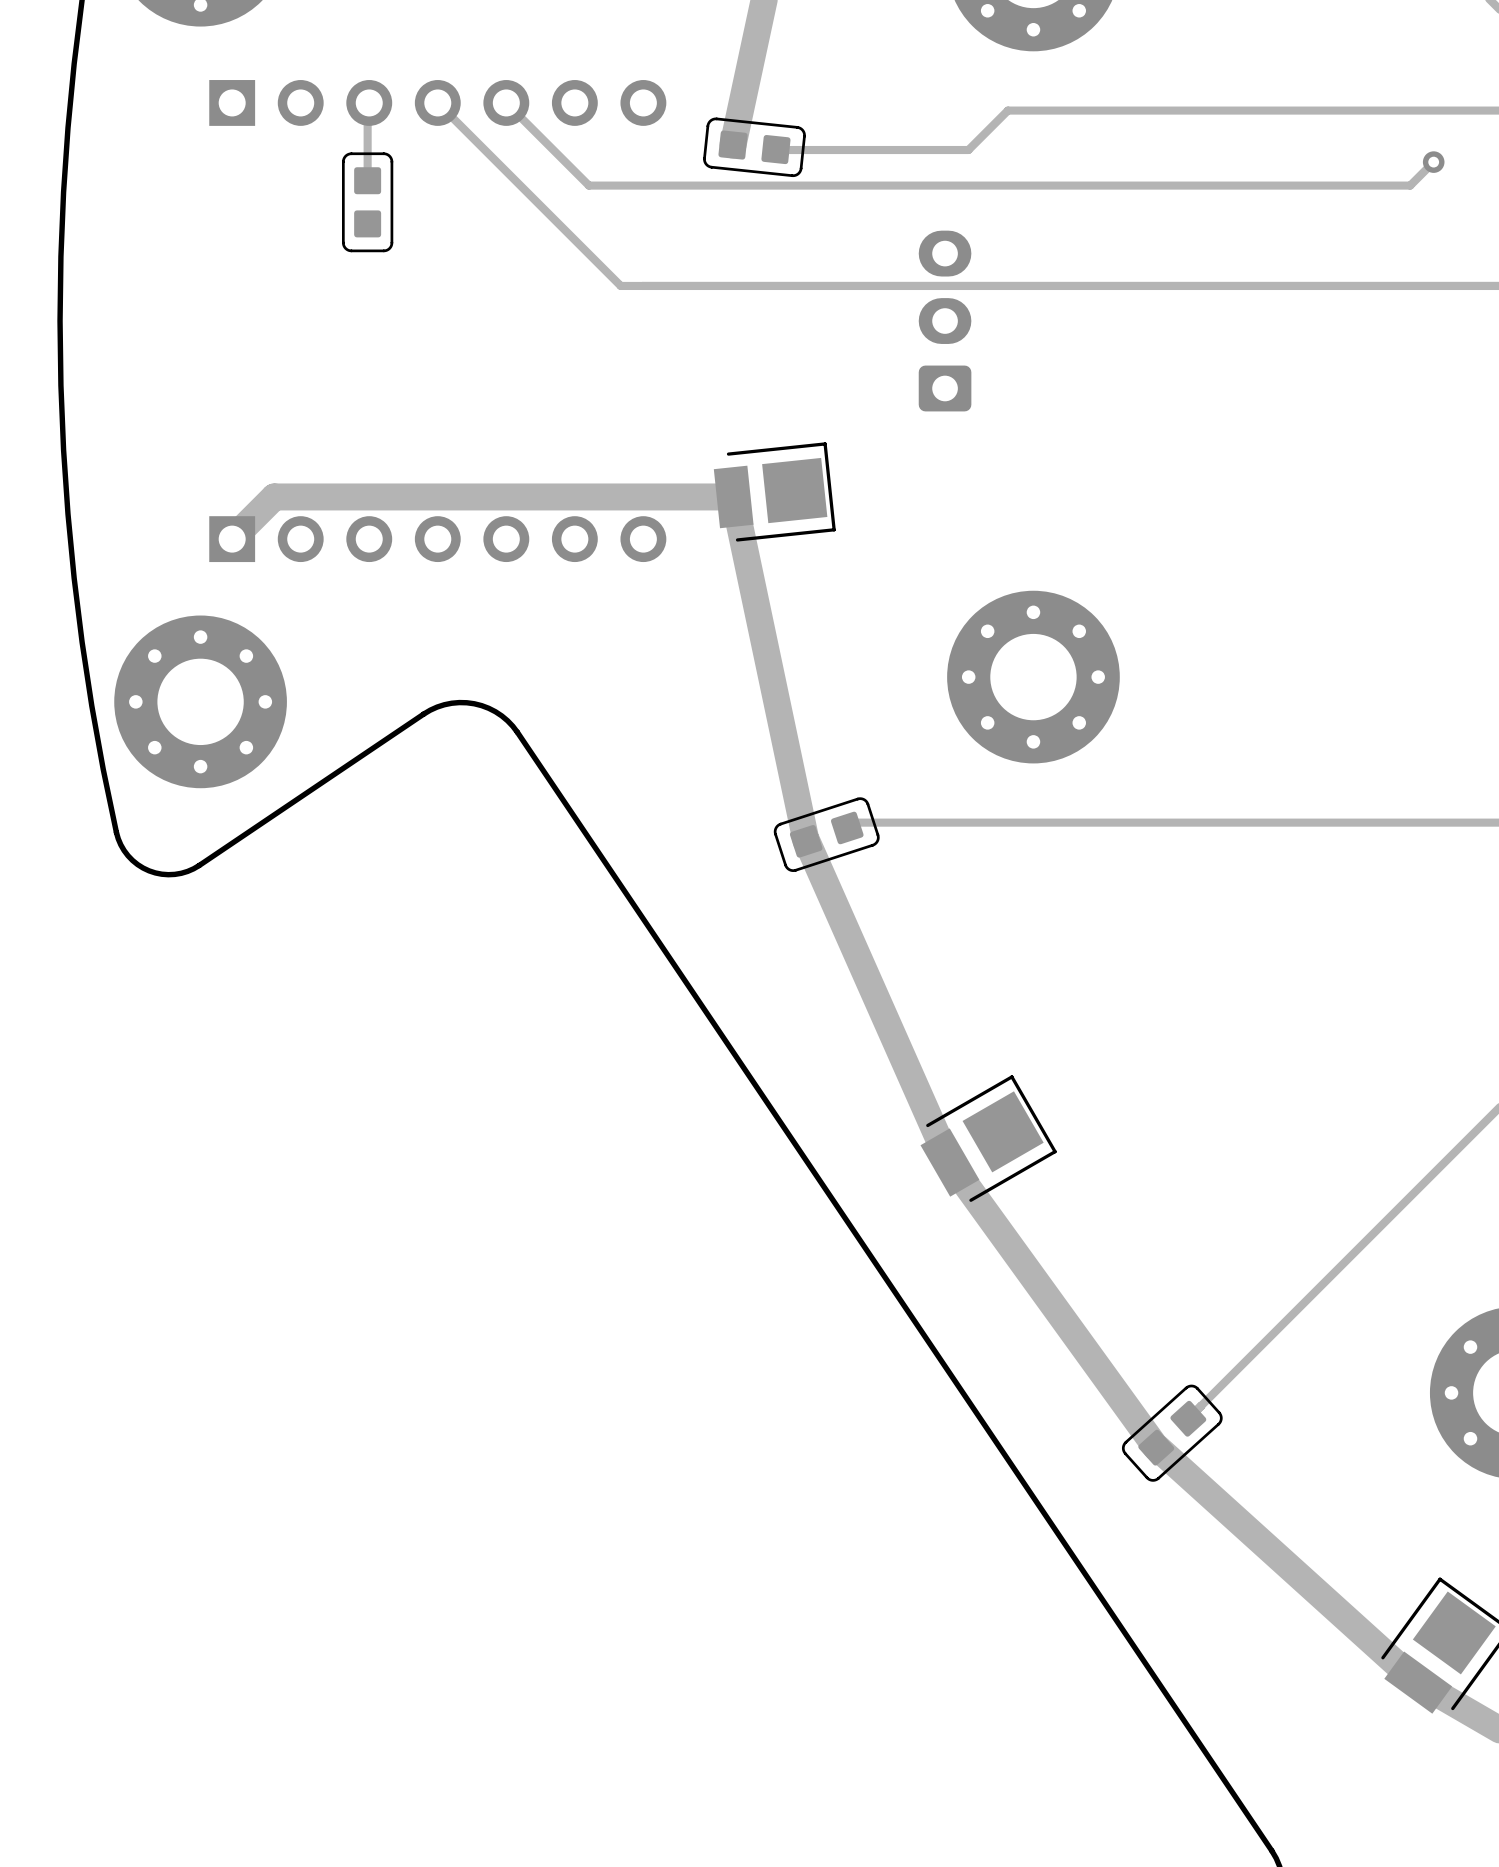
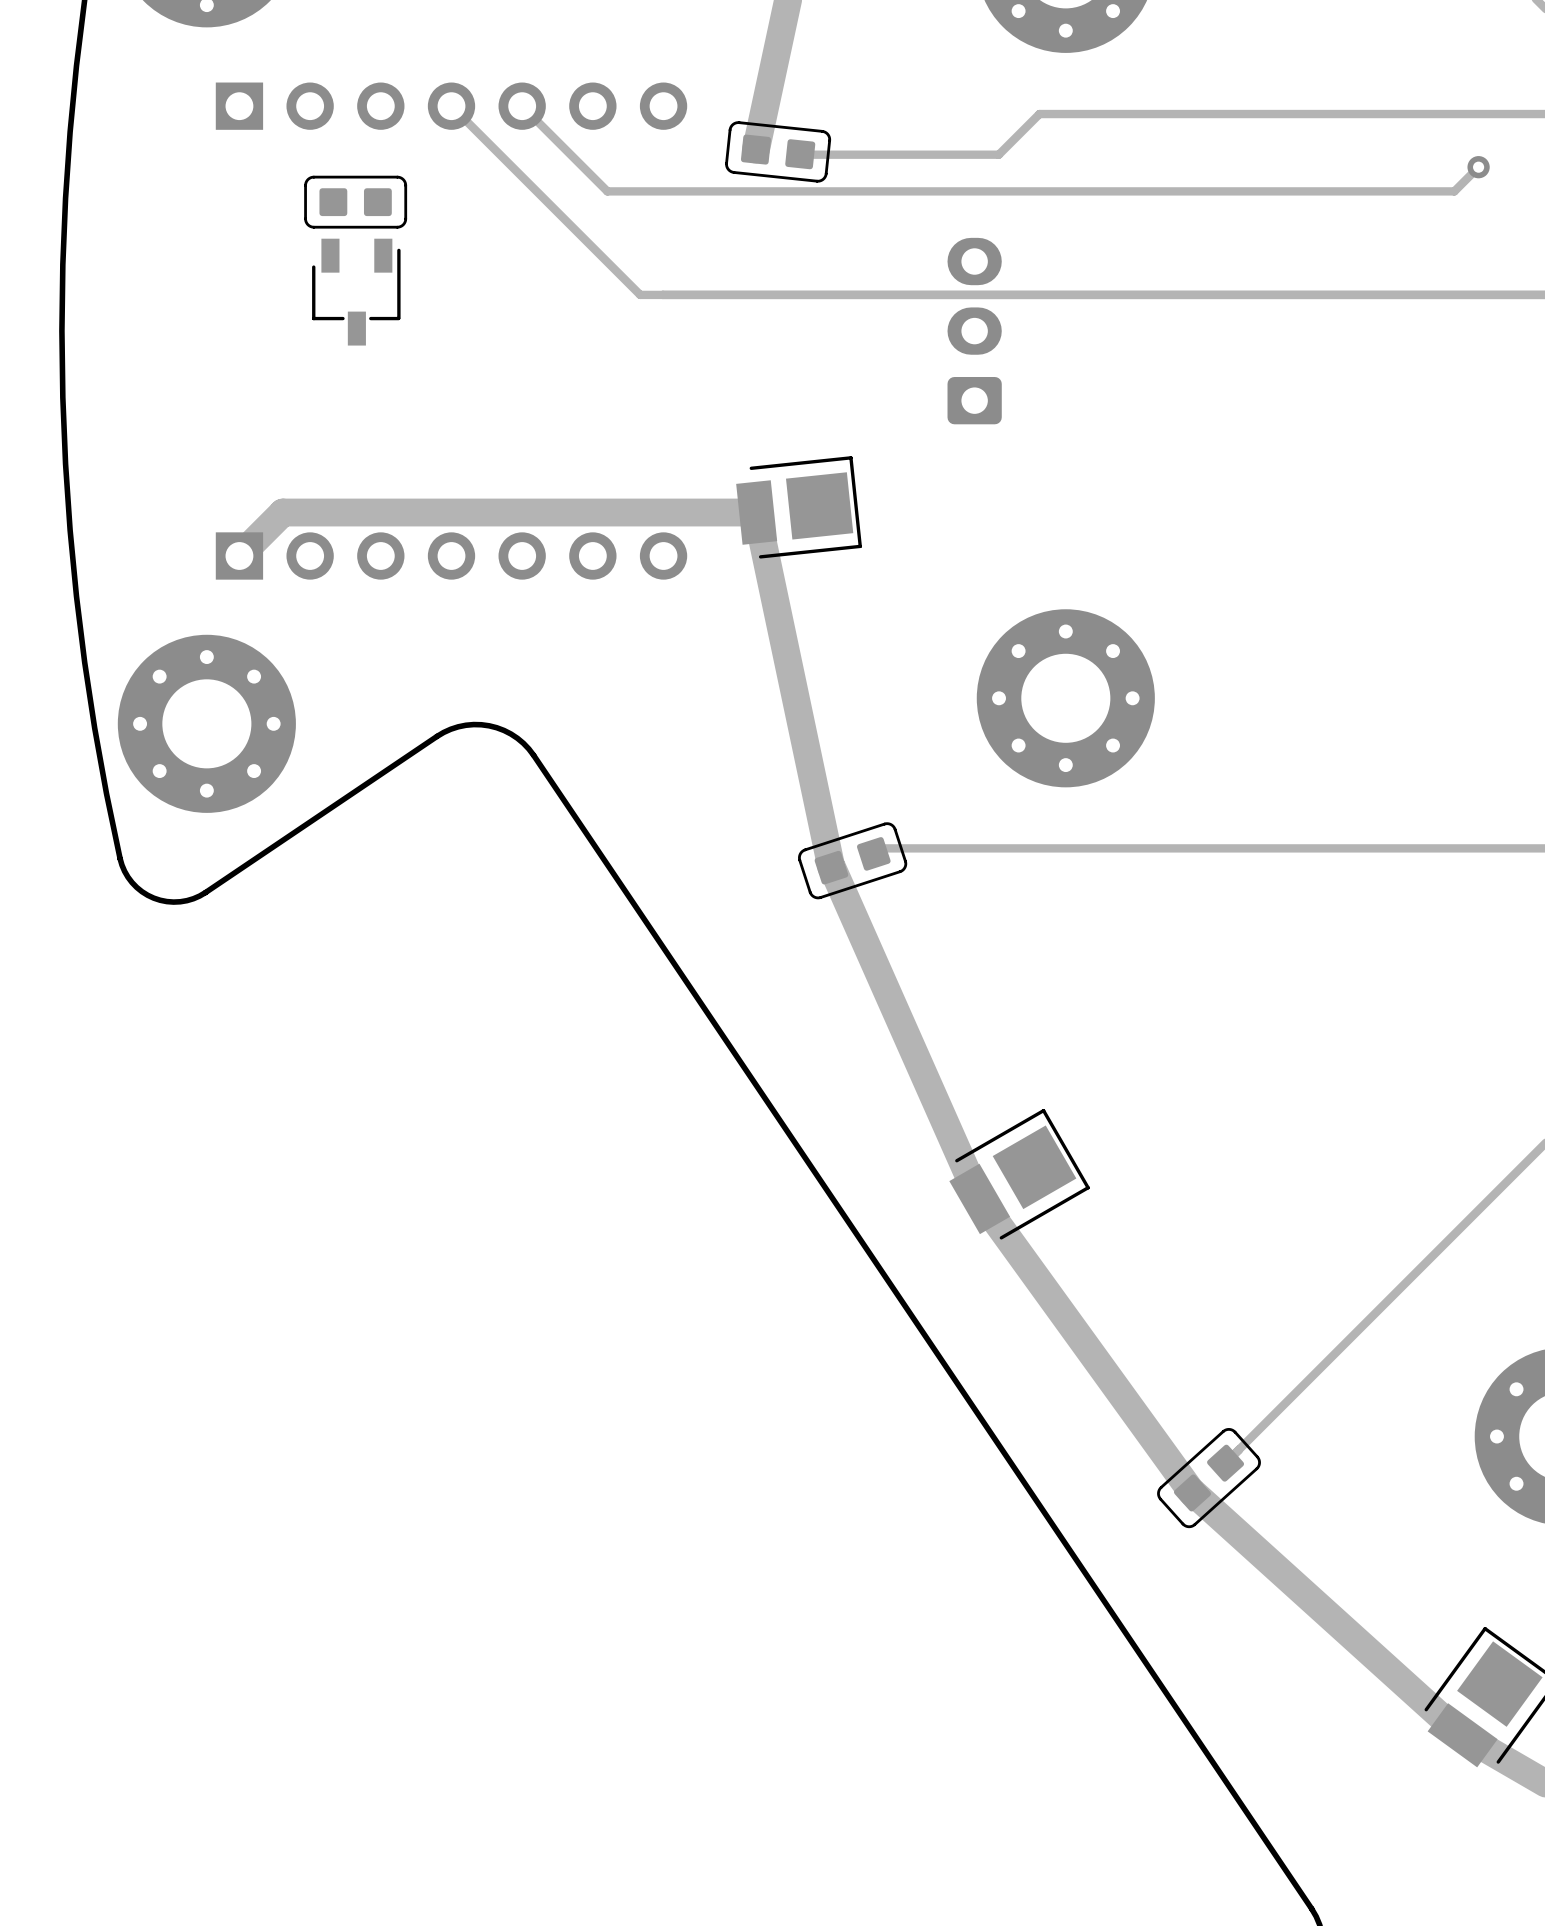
track: (367, 104) (367, 180) -> none
part rotation: 0° (367, 202) -> 90° clockwise (355, 202)
part: none -> (356, 292)

